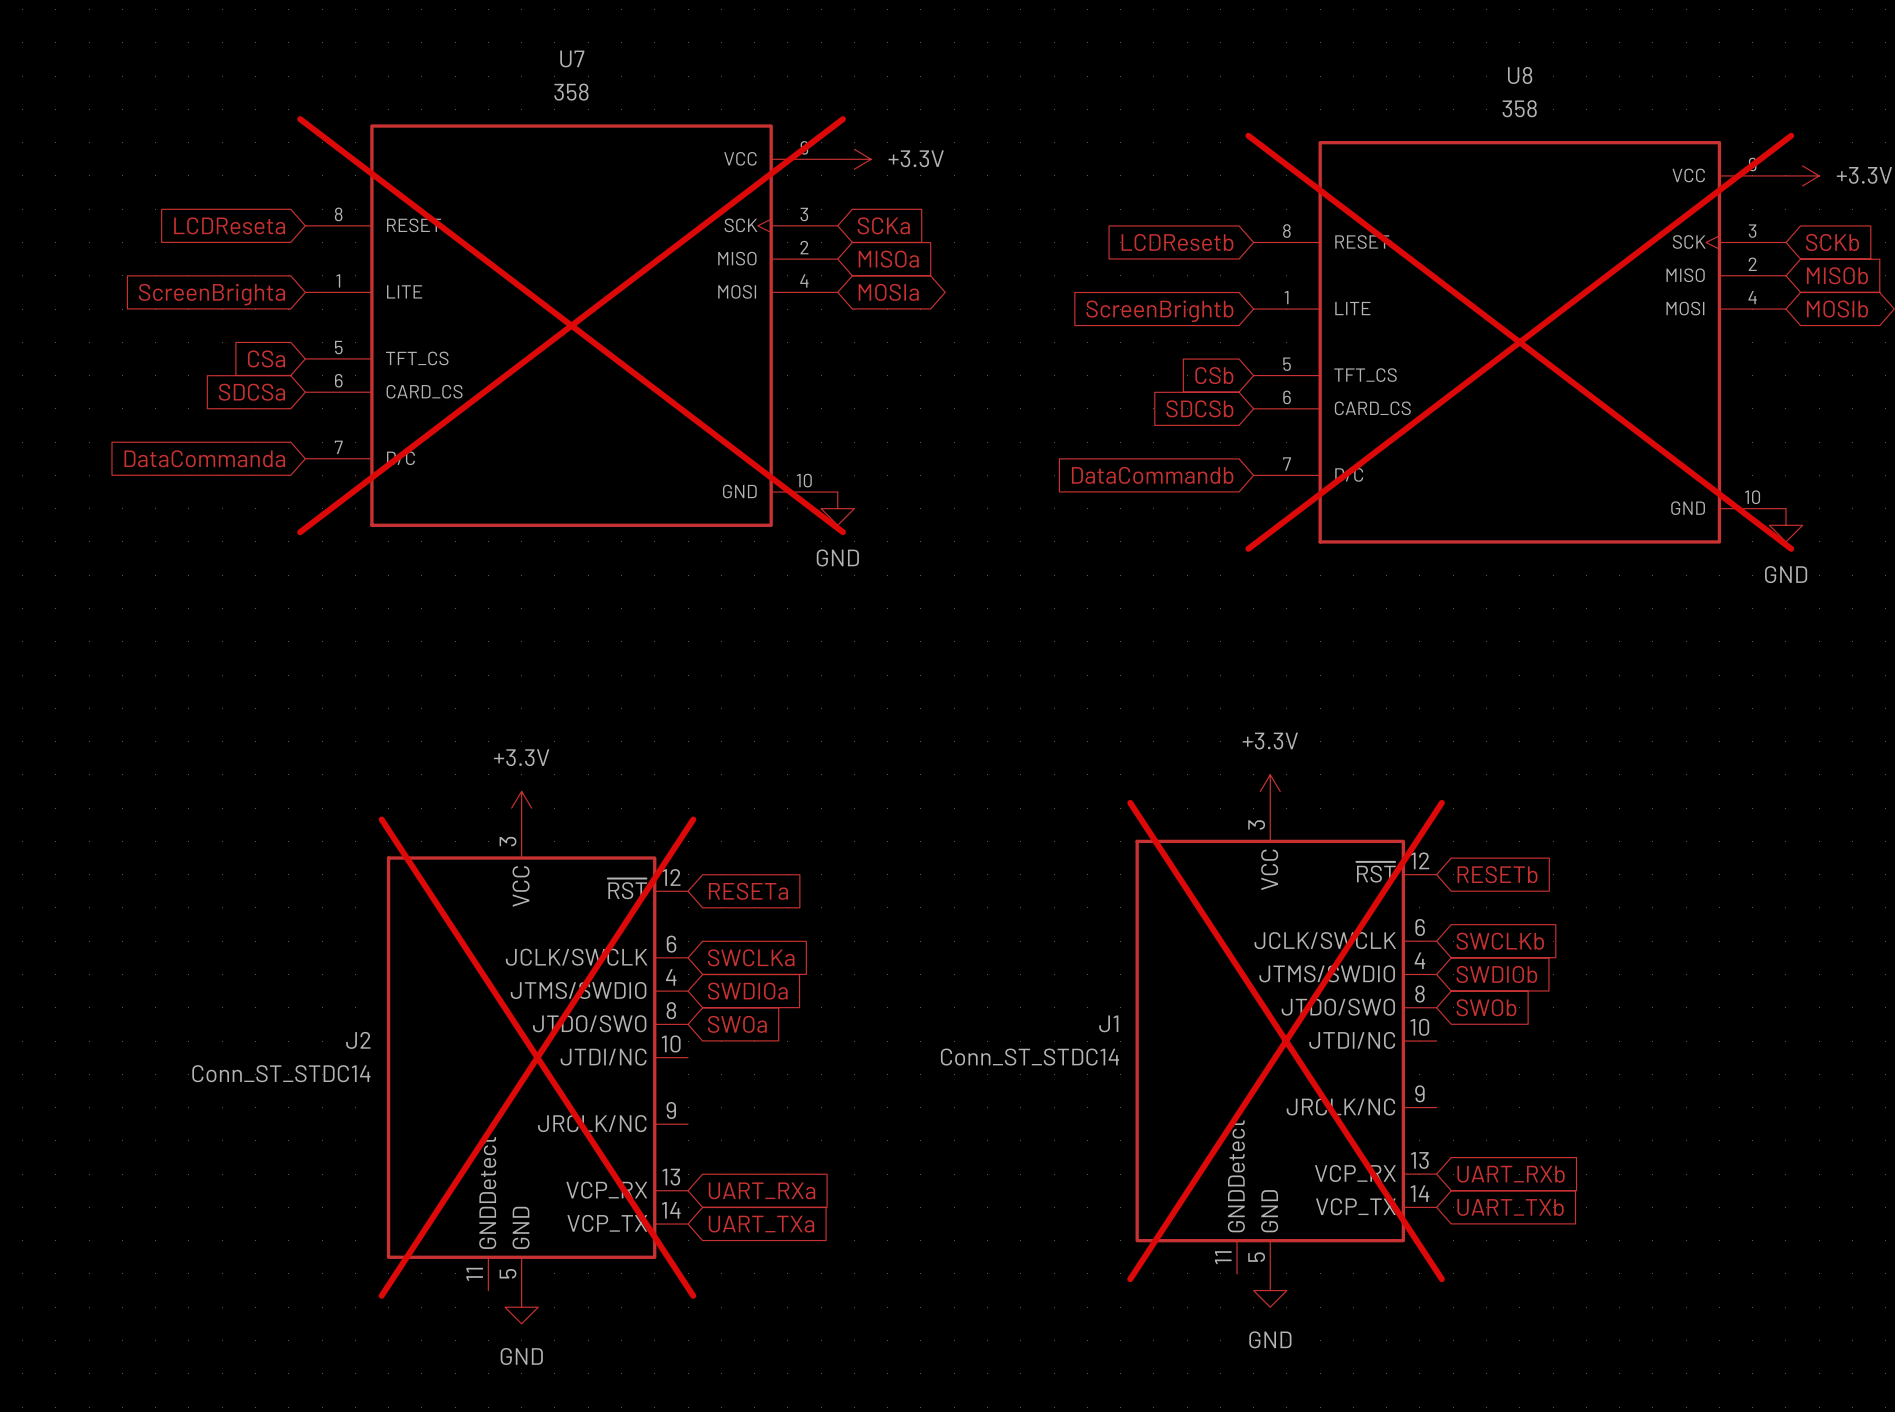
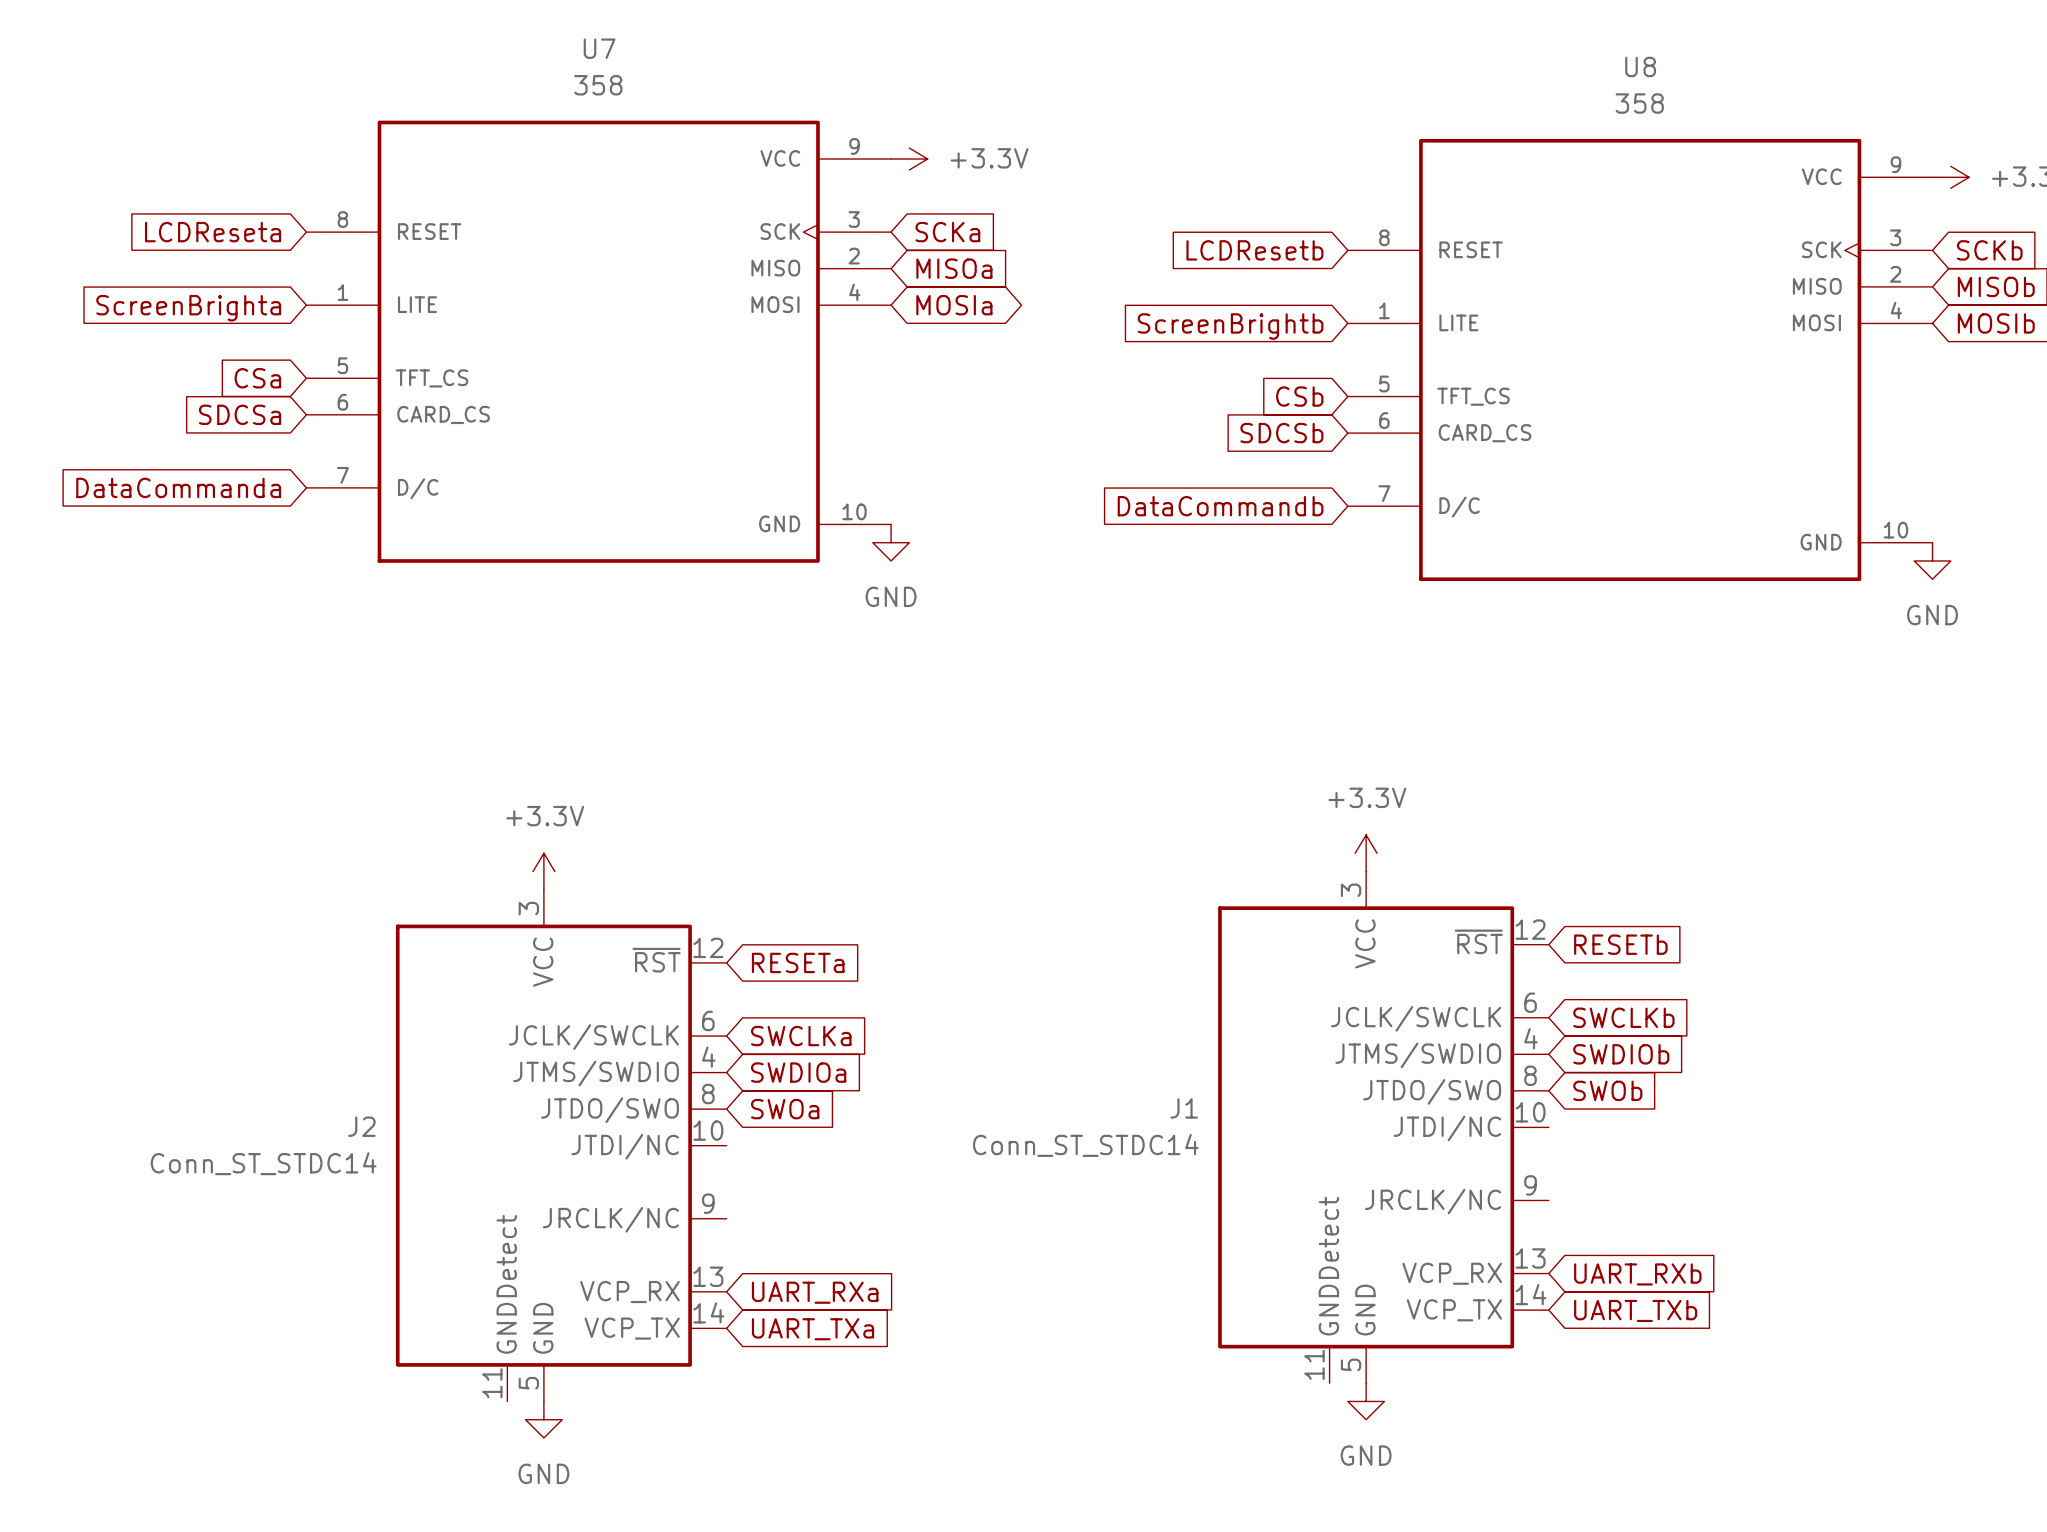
U7 do-not-place cross: (571, 325) -> none
U8 do-not-place cross: (1519, 342) -> none
J1 do-not-place cross: (1286, 1041) -> none
J2 do-not-place cross: (537, 1057) -> none

